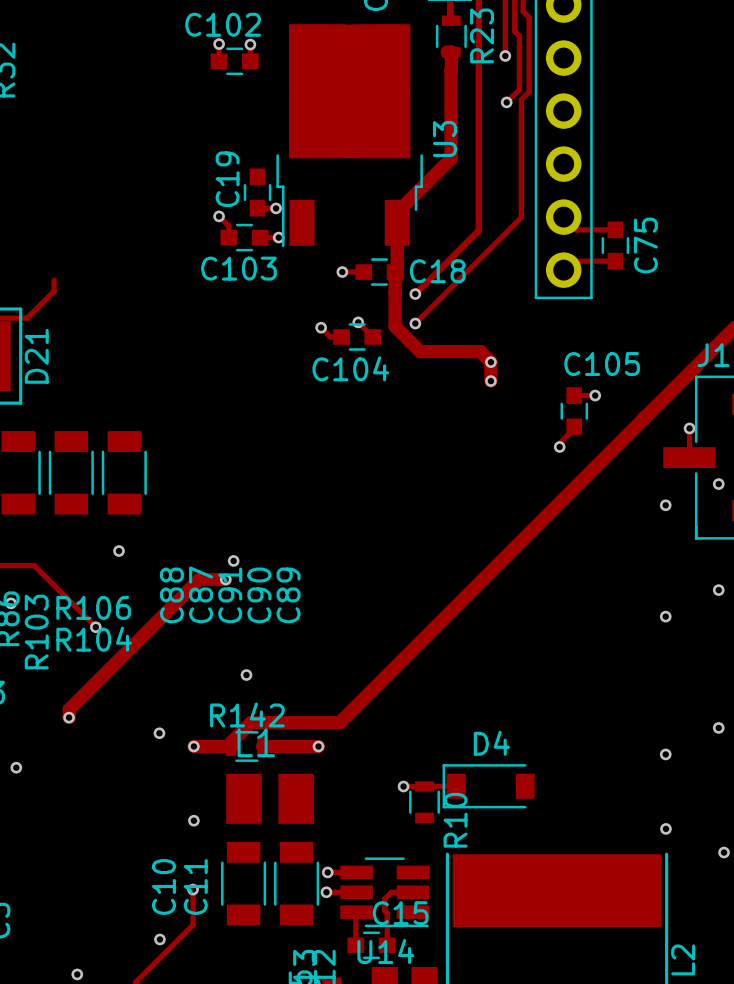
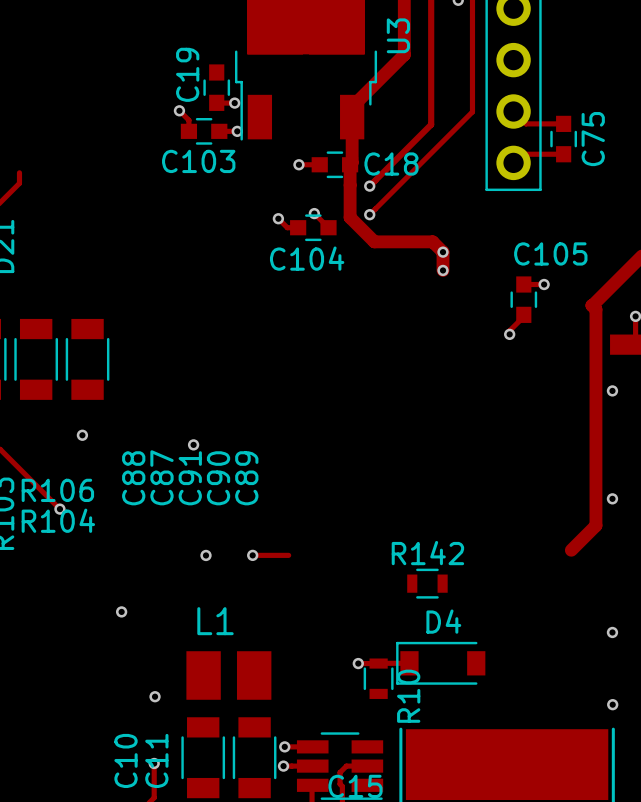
track: (645, 417) (339, 722) (250, 722) (231, 742) (231, 746) (193, 746) -> (591, 305) (595, 309) (595, 525) (571, 550)
track: (225, 579) (199, 579) (69, 709) (69, 717) -> none
via: (225, 579) -> none
track: none -> (252, 555) (288, 555)
via: none -> (252, 555)
via: (69, 717) -> none
via: (193, 746) -> none
R142 position: (246, 746) -> (427, 583)
track: (262, 746) (318, 746) -> none
via: (318, 746) -> none

